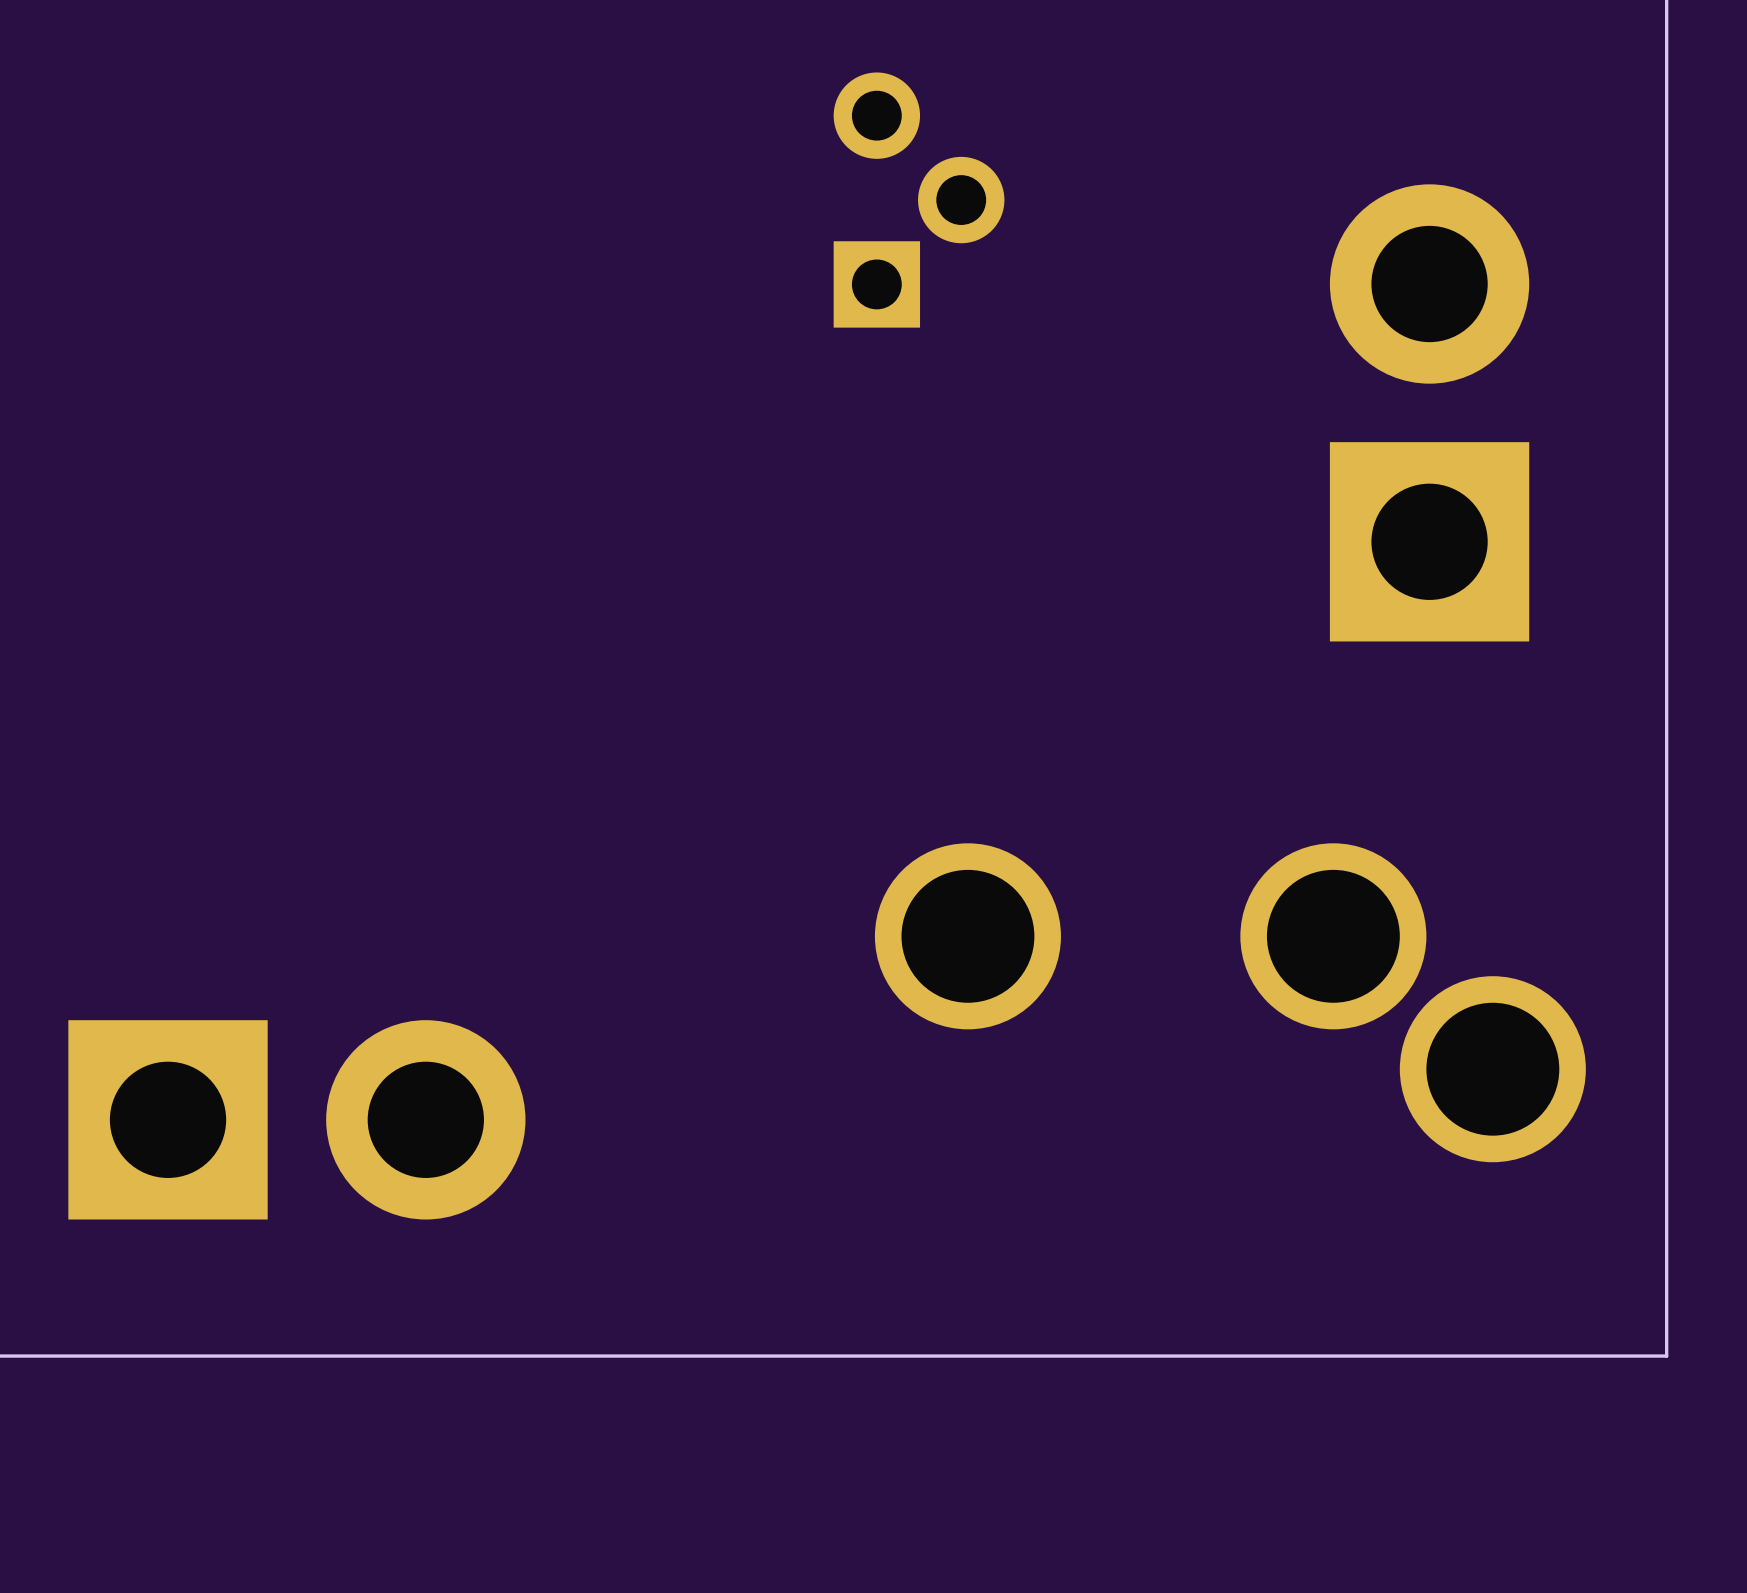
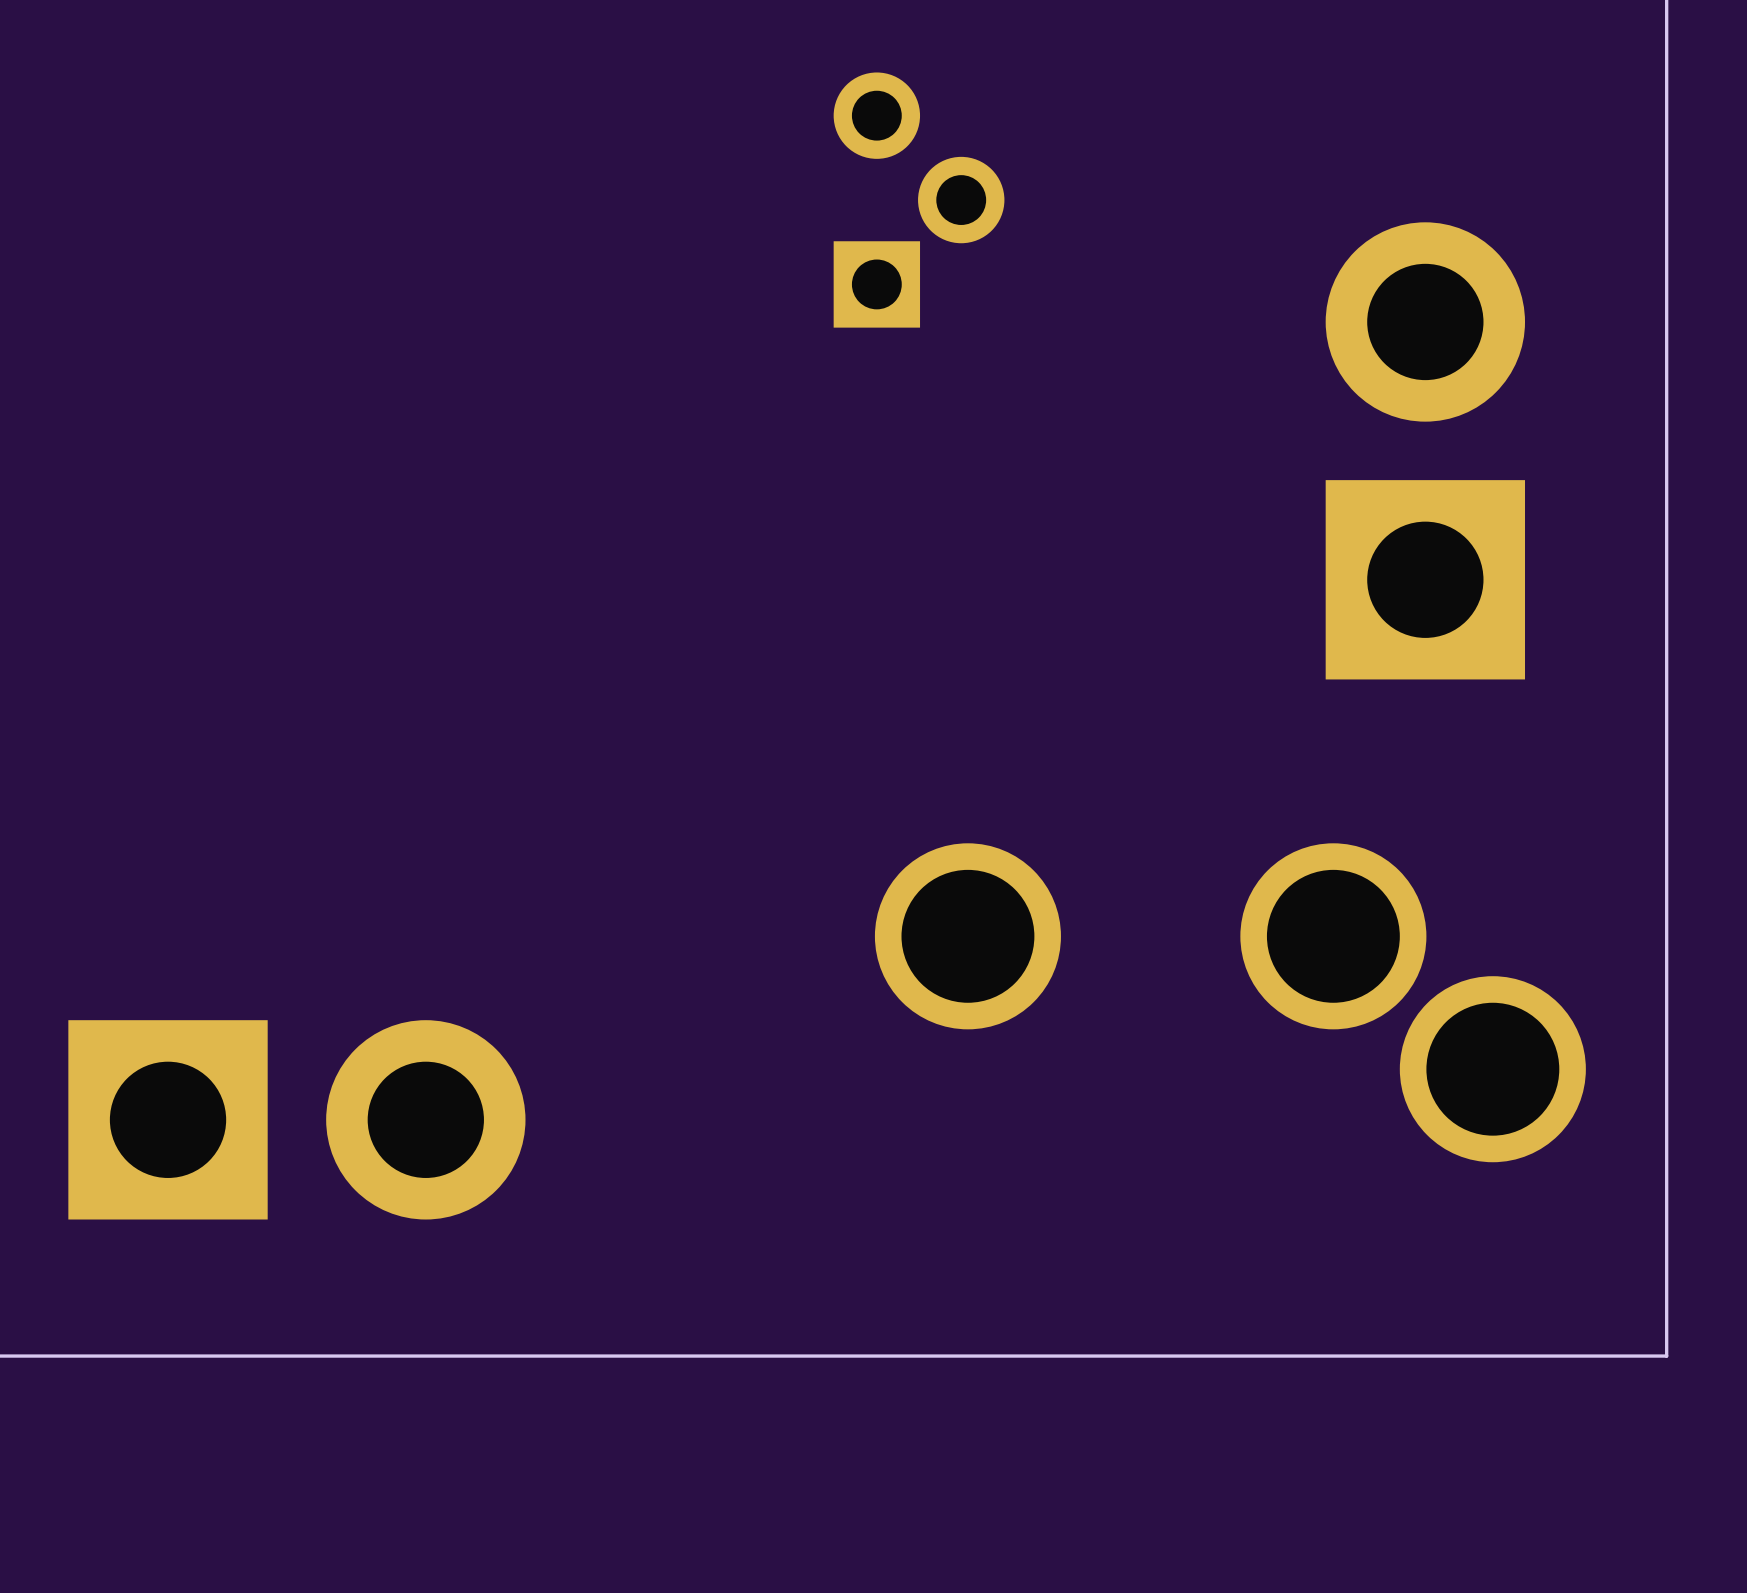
part position: (1429, 412) -> (1425, 450)

